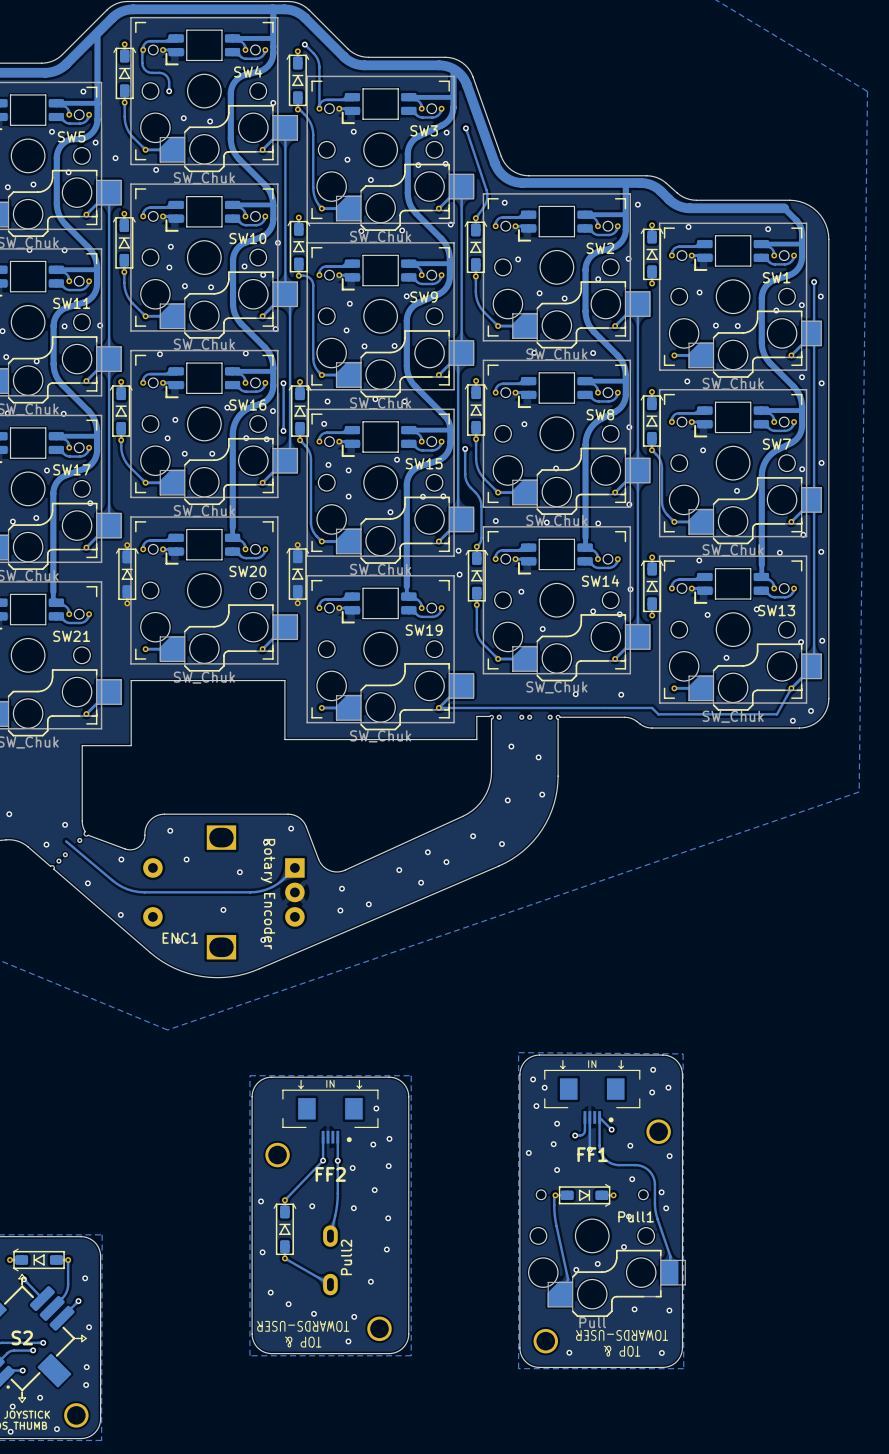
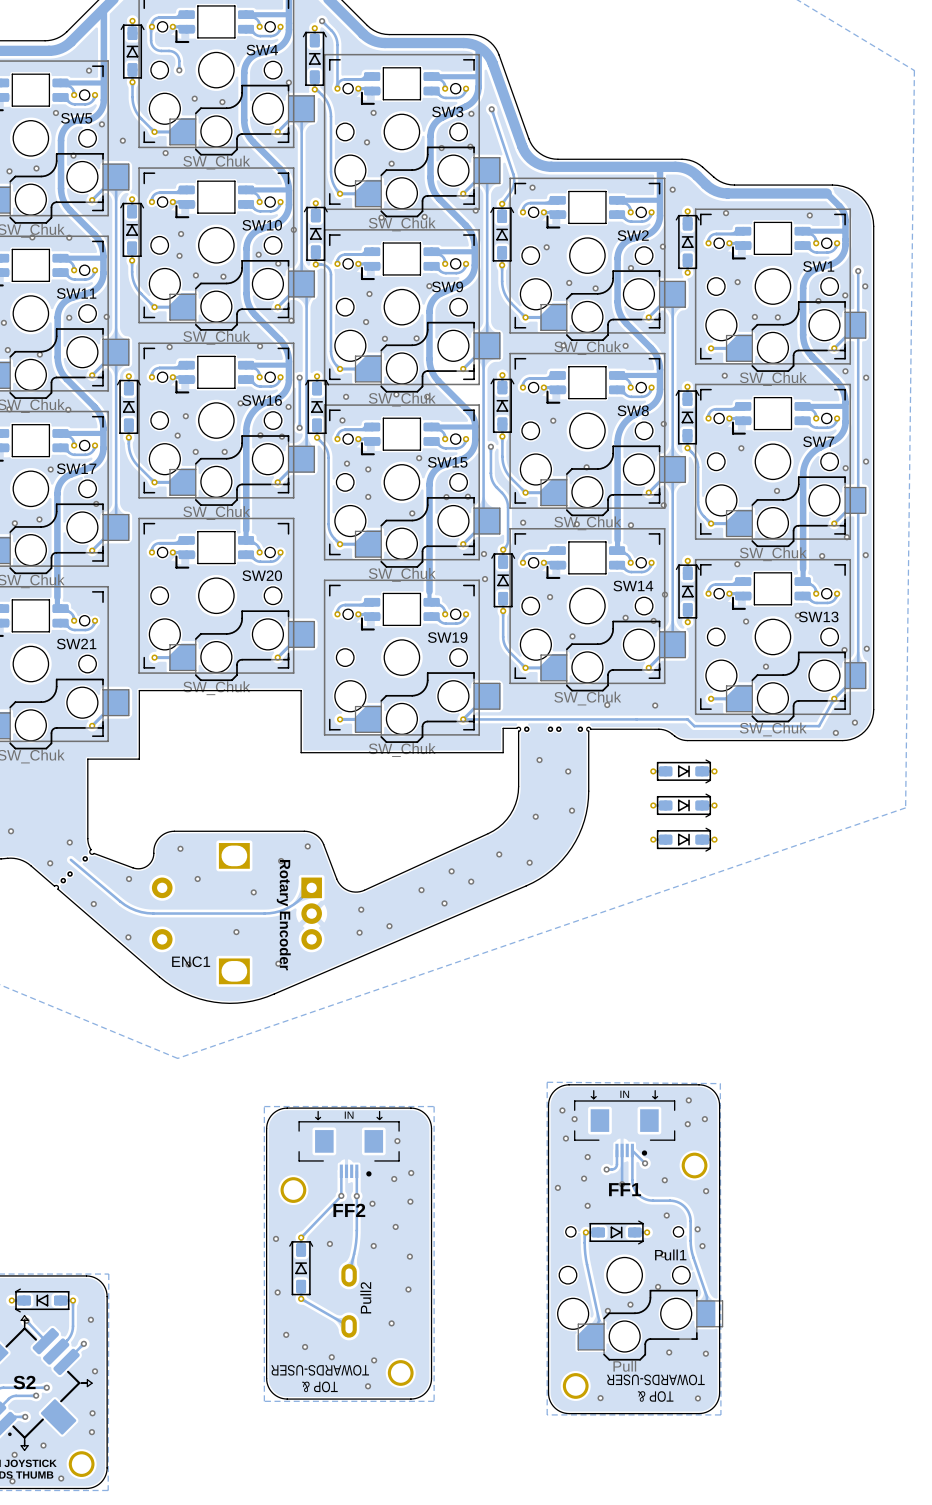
part: (127, 574) -> none
part: (297, 574) -> none
part: none -> (683, 771)
part: none -> (683, 805)
part: none -> (683, 839)

